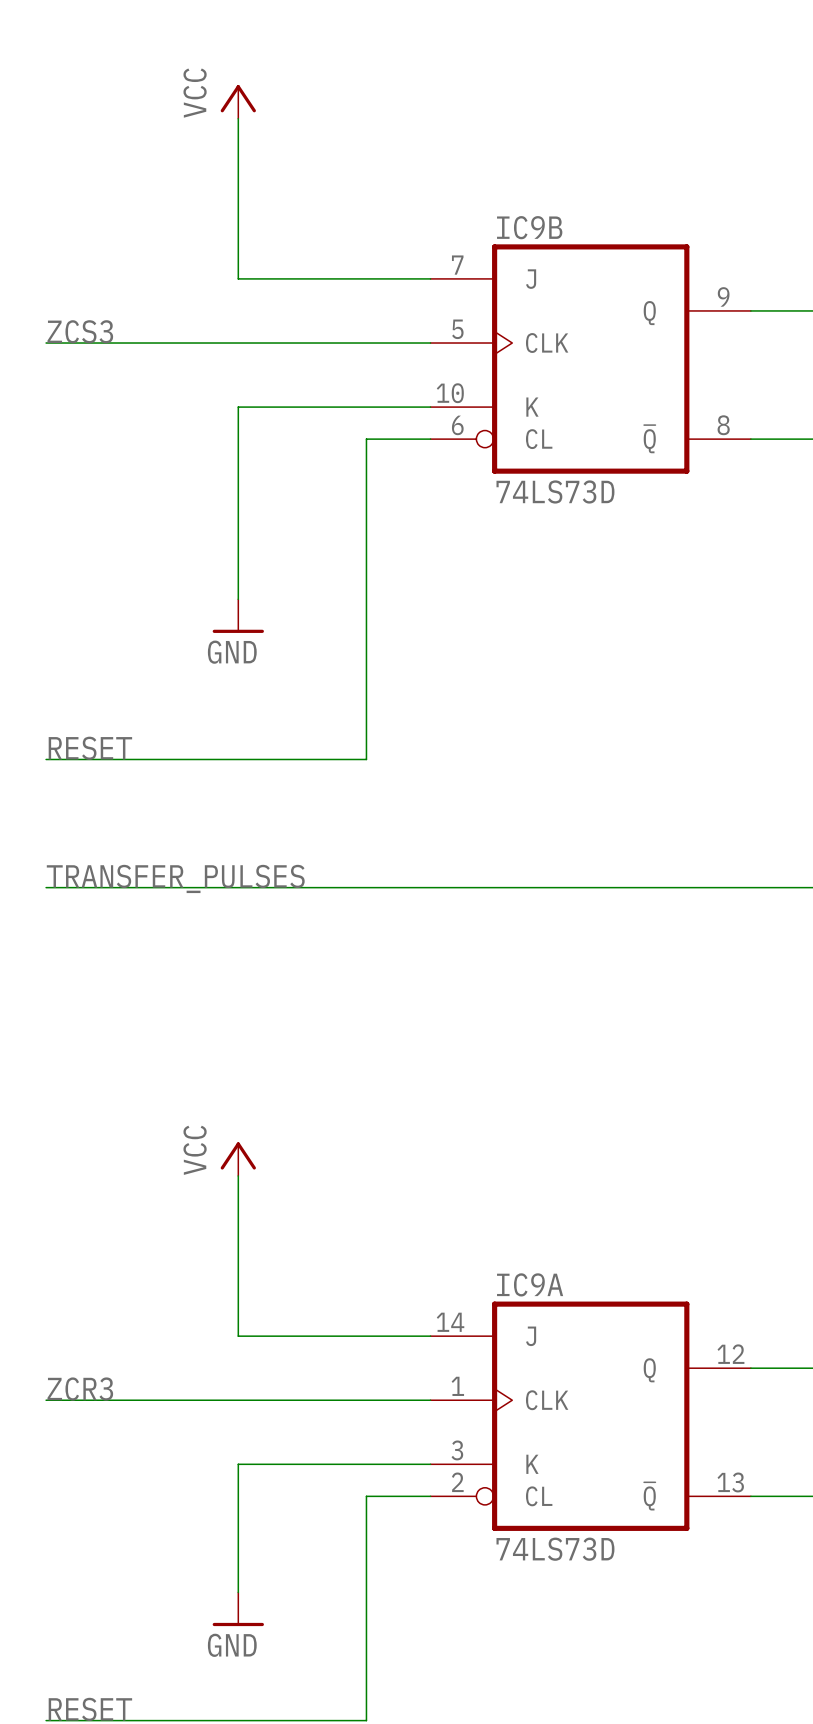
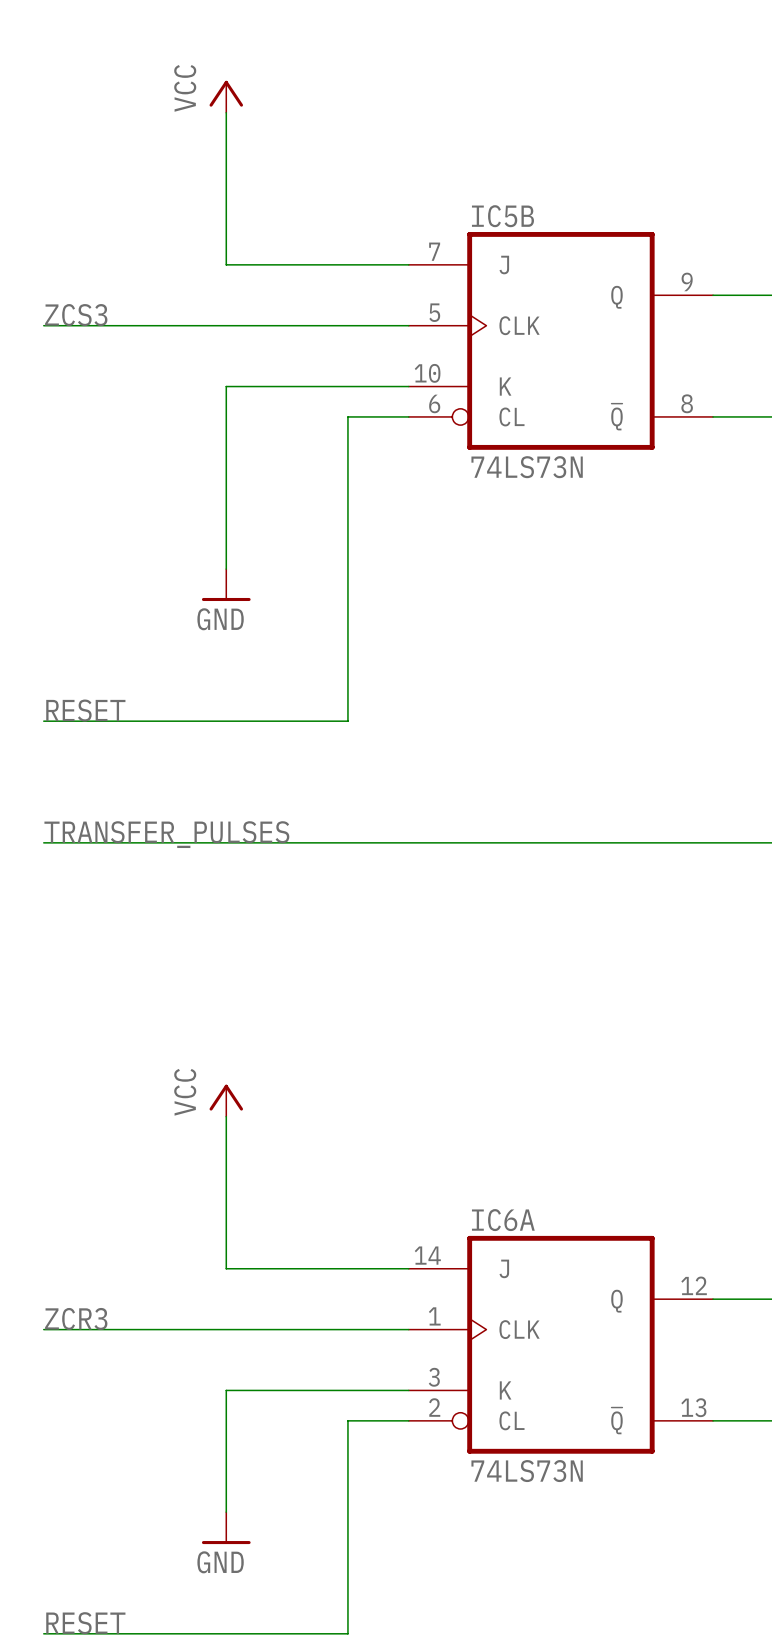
IC9B name: IC9B (529, 227) -> IC5B (502, 216)
IC9B value: 74LS73D (555, 491) -> 74LS73N (527, 467)
IC9A name: IC9A (530, 1284) -> IC6A (503, 1220)
IC9A value: 74LS73D (555, 1549) -> 74LS73N (527, 1471)

